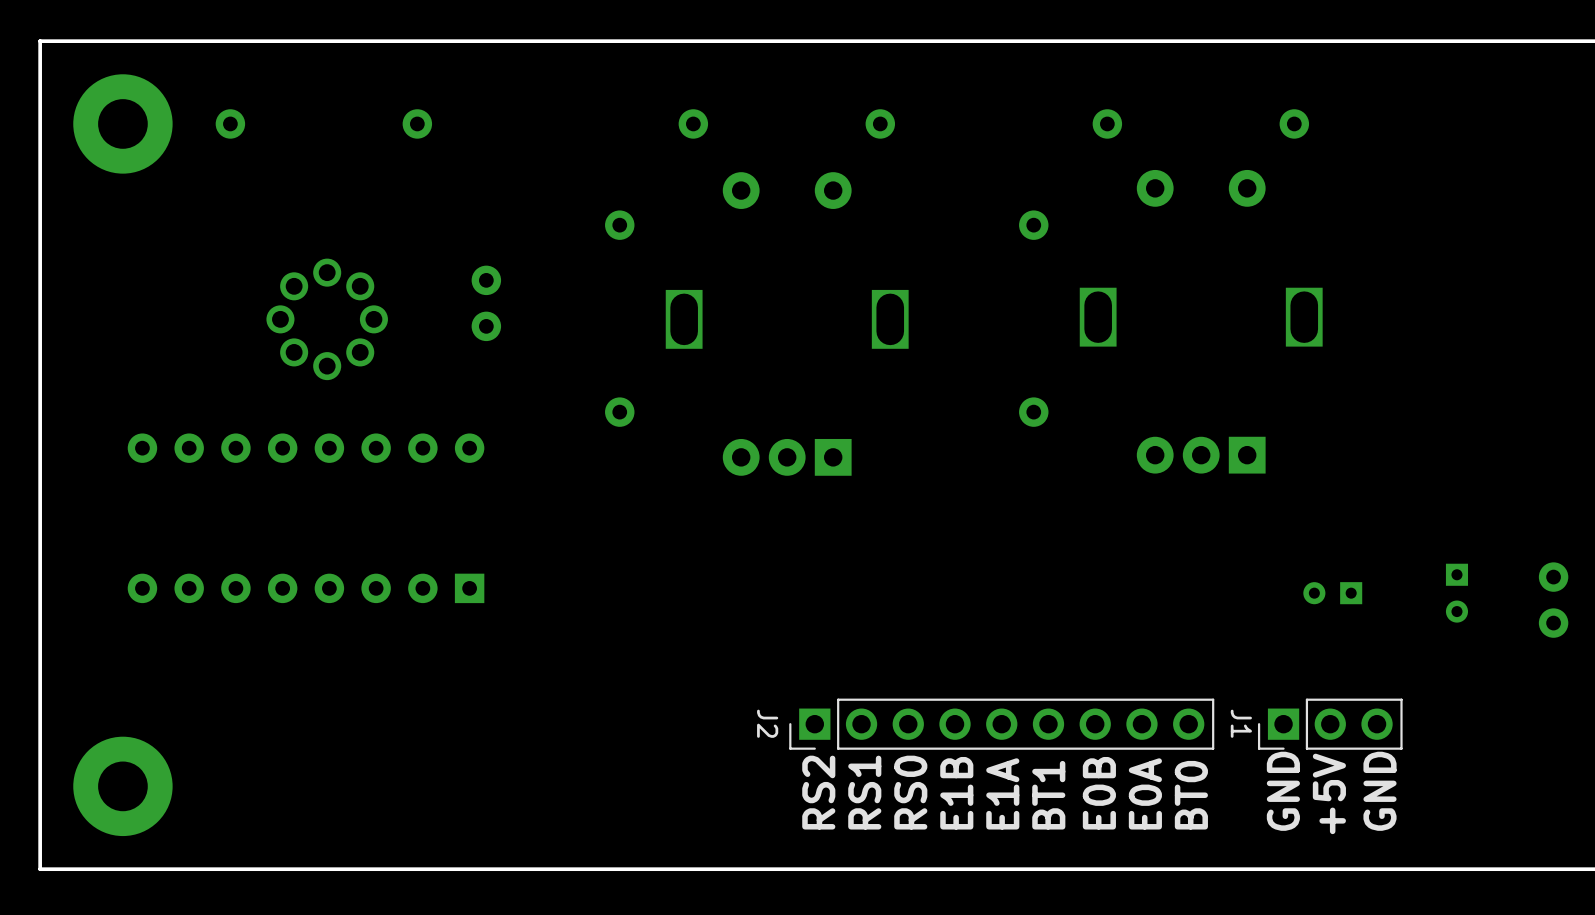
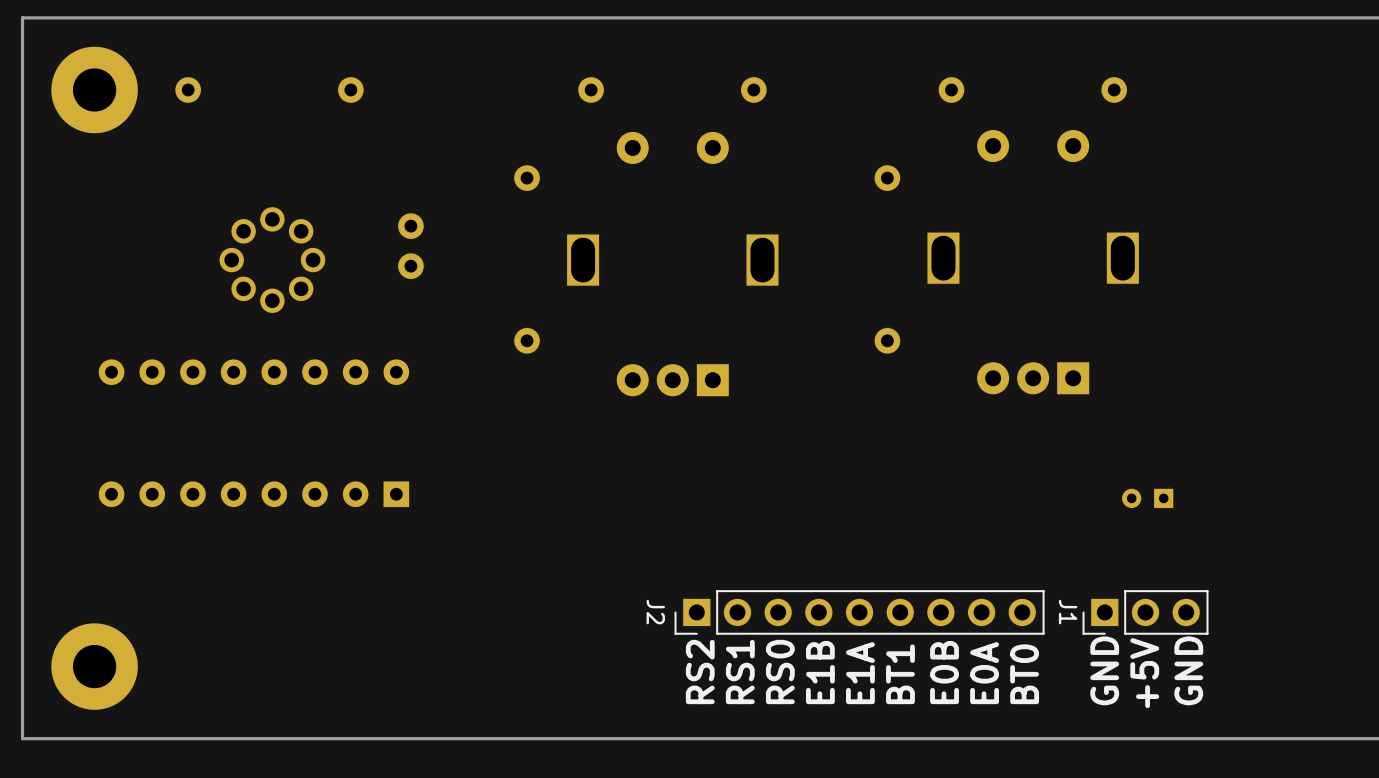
part: (1456, 593) -> none
part: (1553, 600) -> none

